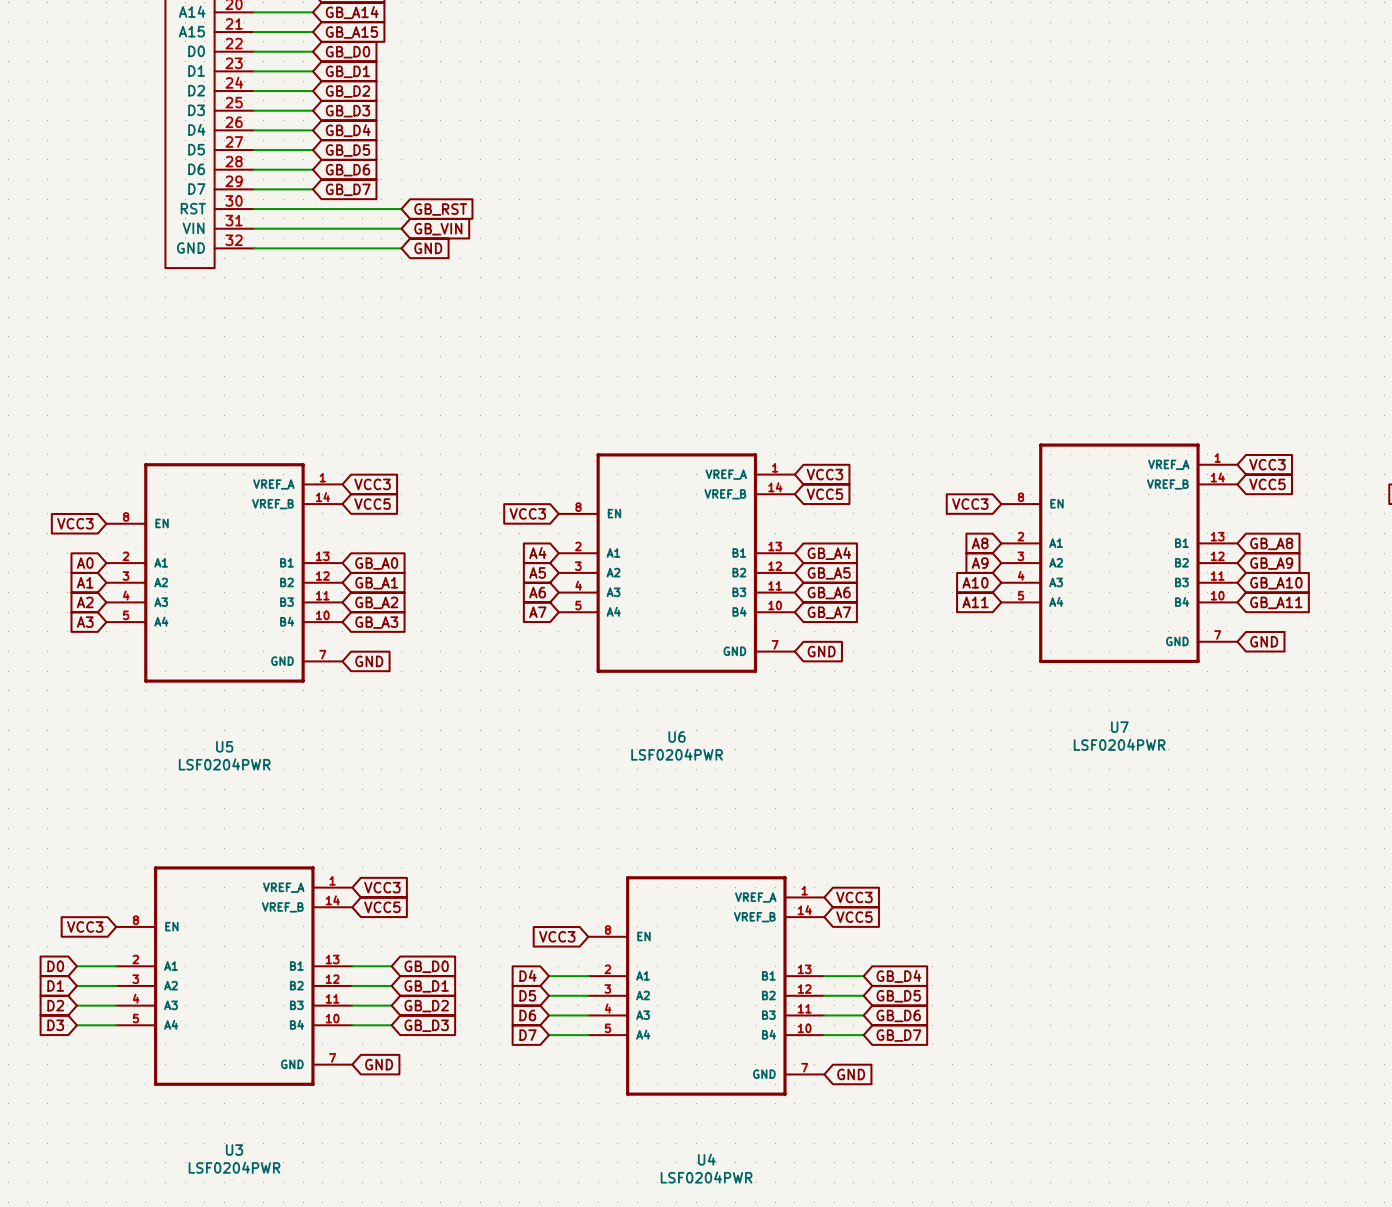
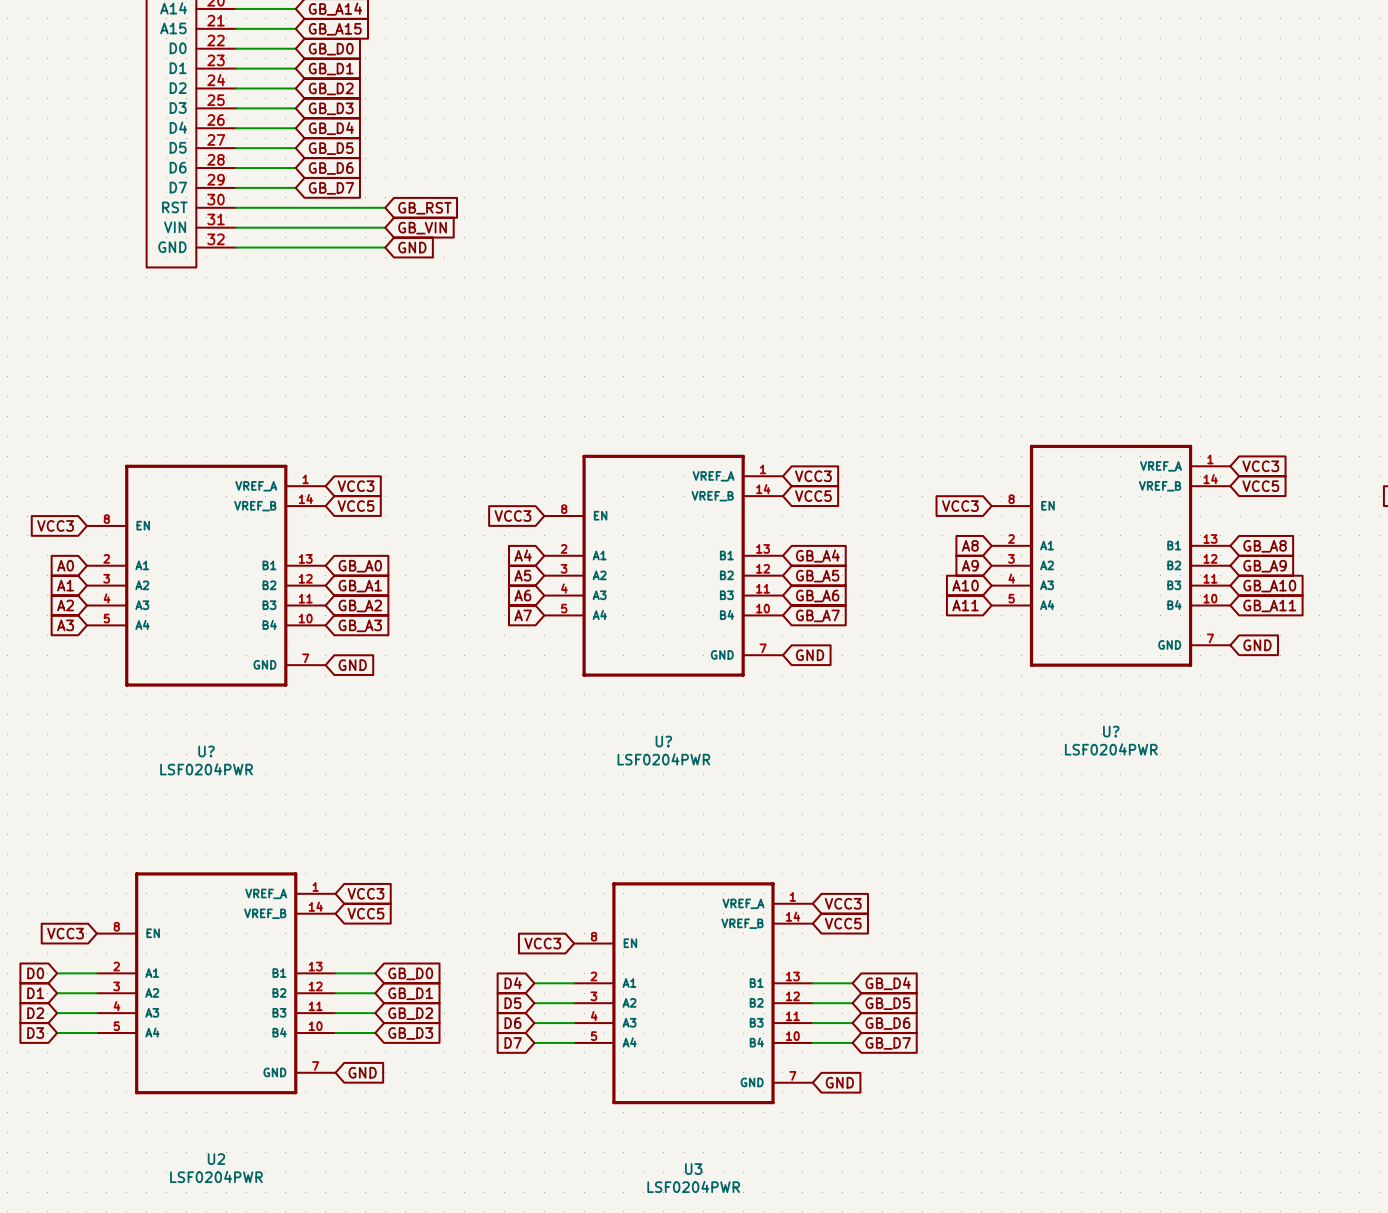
U7 name: U7 (1119, 727) -> U? (1111, 731)
U6 name: U6 (677, 736) -> U? (663, 741)
U5 name: U5 (224, 746) -> U? (206, 751)
U3 name: U3 (234, 1150) -> U2 (216, 1159)
U4 name: U4 (706, 1159) -> U3 (693, 1169)

